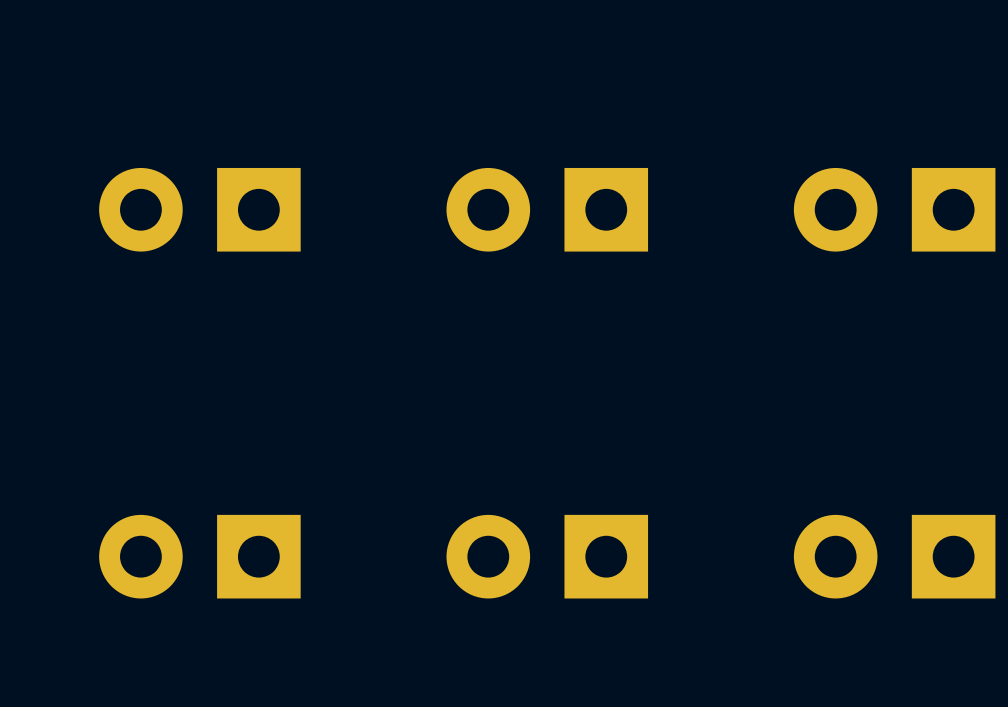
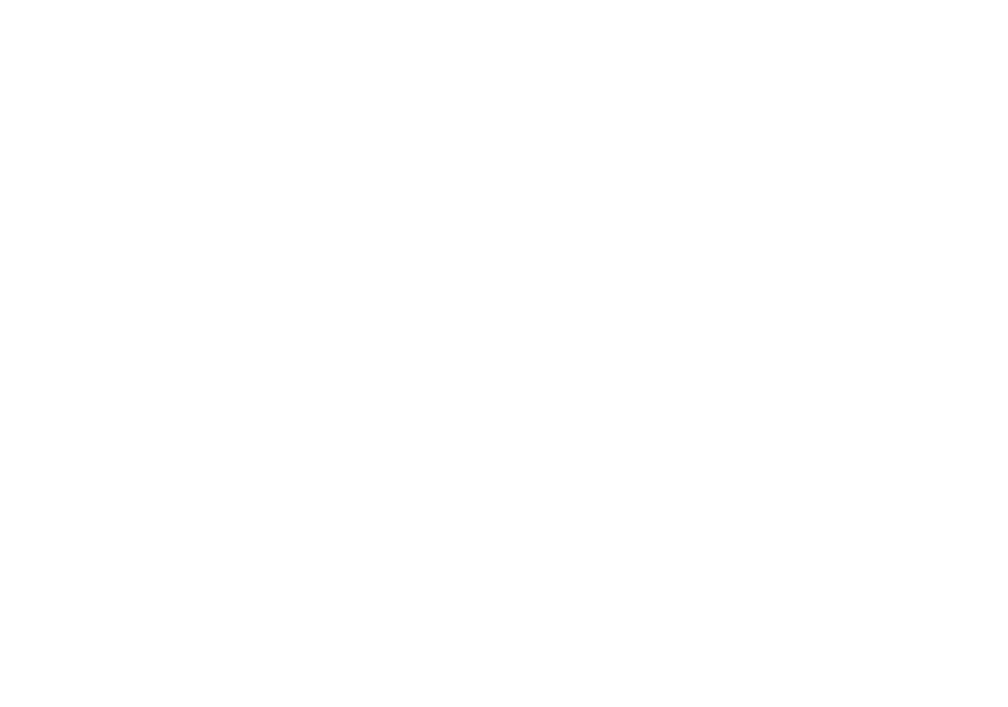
part: (199, 209) -> none
part: (547, 209) -> none
part: (894, 209) -> none
part: (199, 556) -> none
part: (547, 556) -> none
part: (894, 556) -> none

